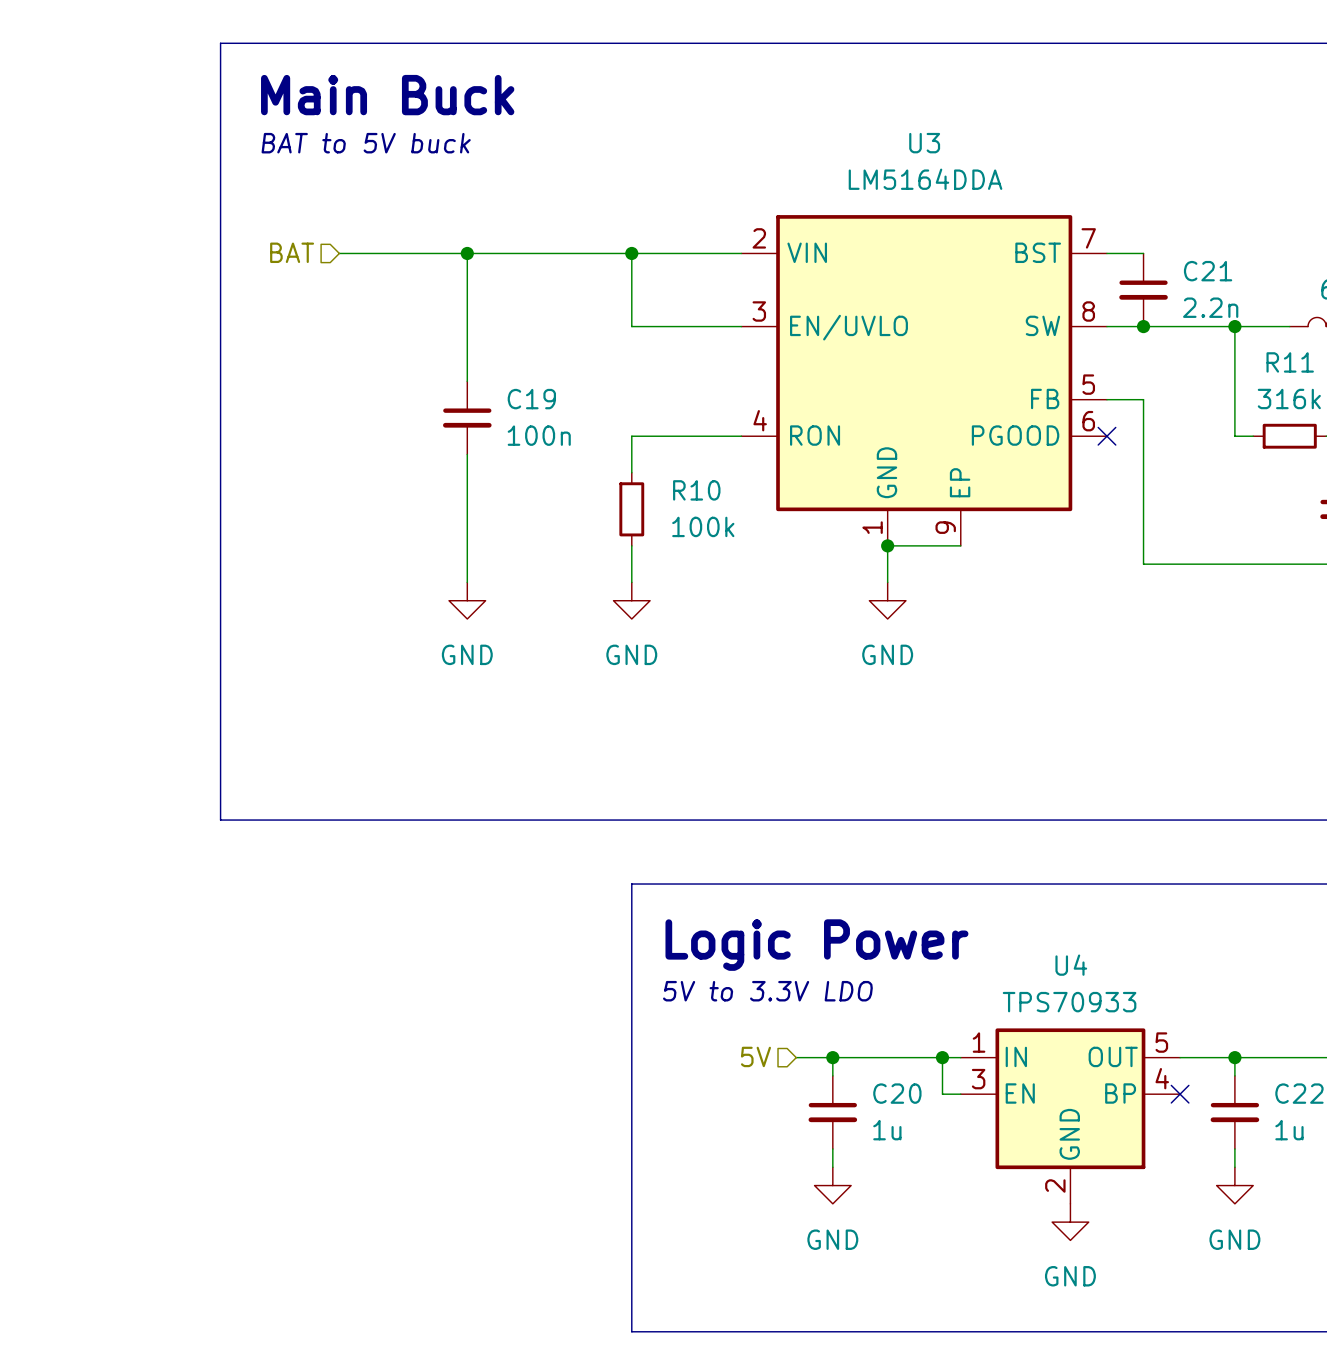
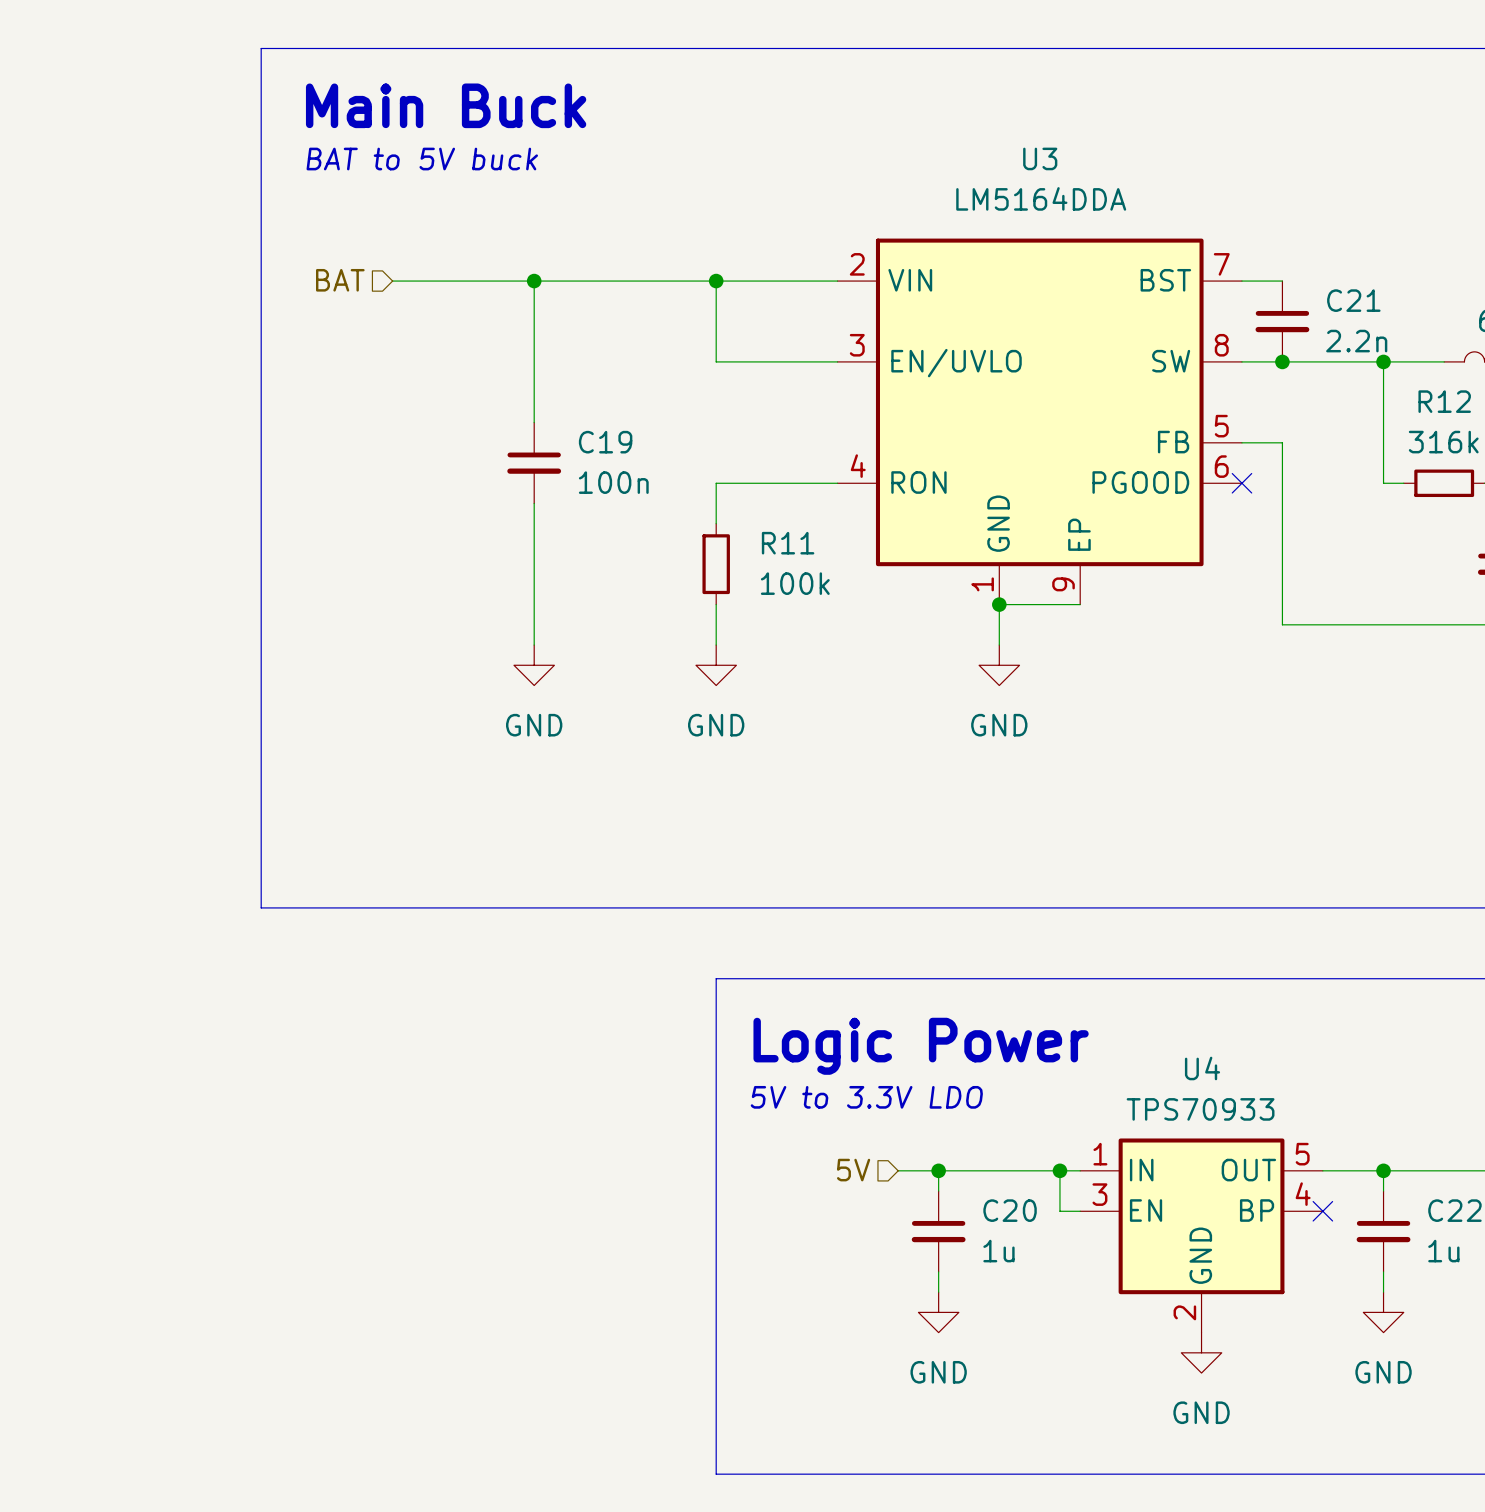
R11 name: R11 (1290, 362) -> R12 (1444, 401)
R10 name: R10 (696, 490) -> R11 (788, 543)

